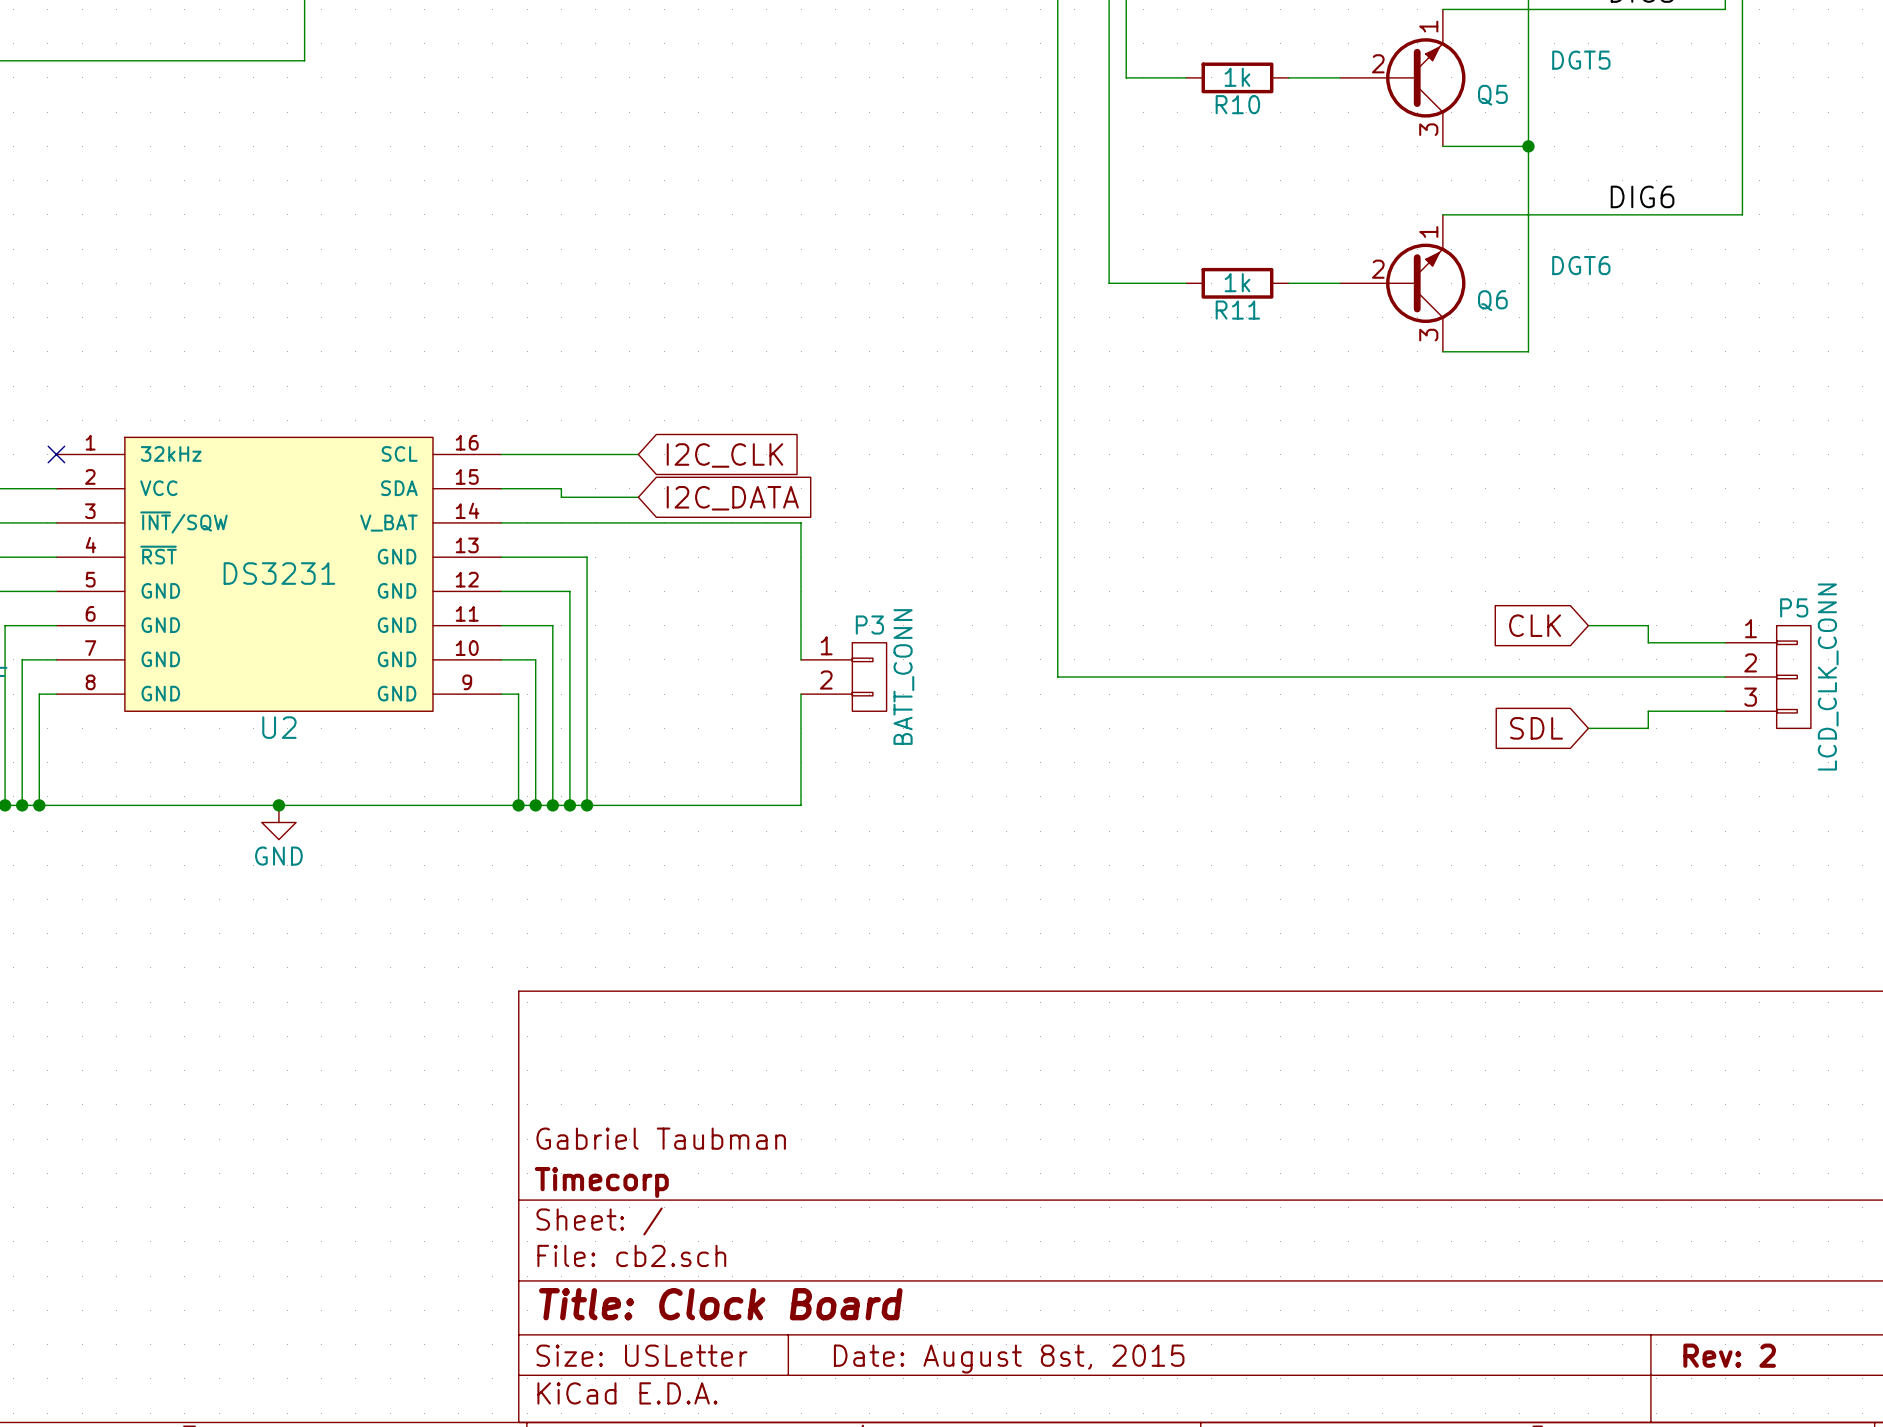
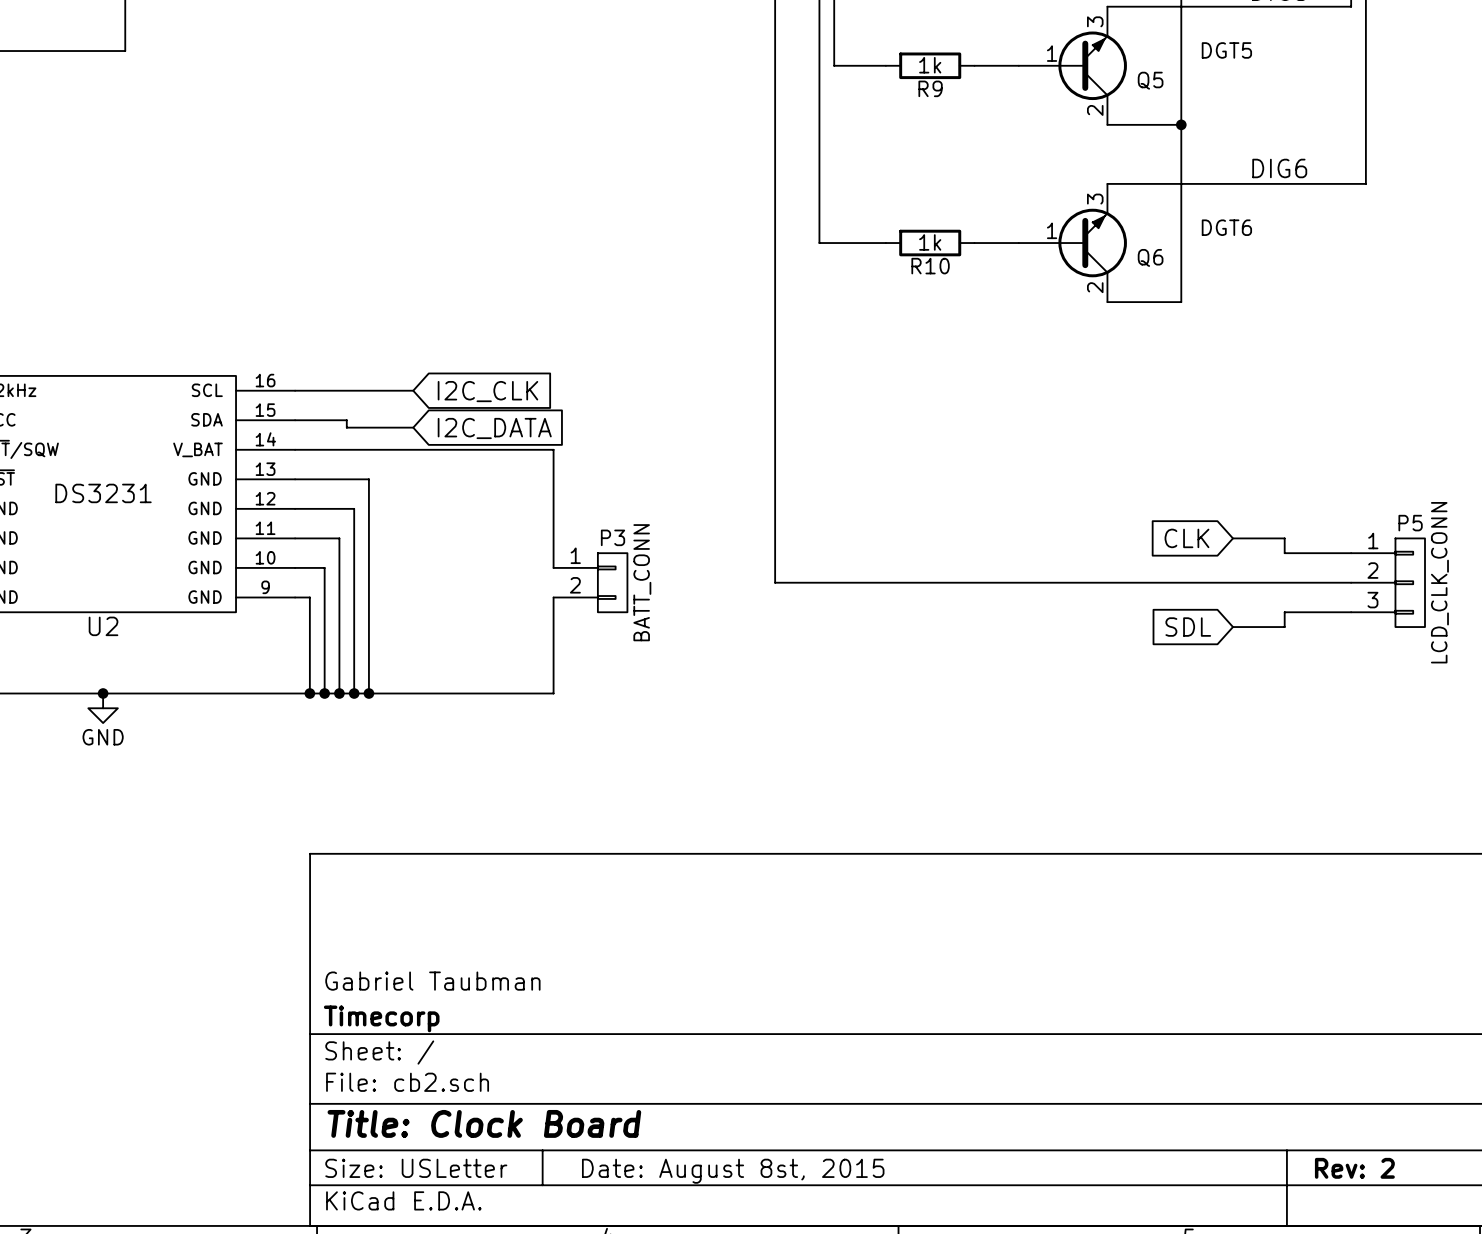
Q5 pin number: 1 (1428, 26) -> 3 (1095, 21)
Q5 pin number: 2 (1378, 63) -> 1 (1052, 53)
R10 name: R10 (1237, 104) -> R9 (930, 88)
Q5 pin number: 3 (1428, 129) -> 2 (1095, 110)
Q6 pin number: 1 (1428, 231) -> 3 (1095, 199)
Q6 pin number: 2 (1378, 269) -> 1 (1052, 230)
R11 name: R11 (1237, 310) -> R10 (930, 266)
Q6 pin number: 3 (1428, 335) -> 2 (1095, 287)

